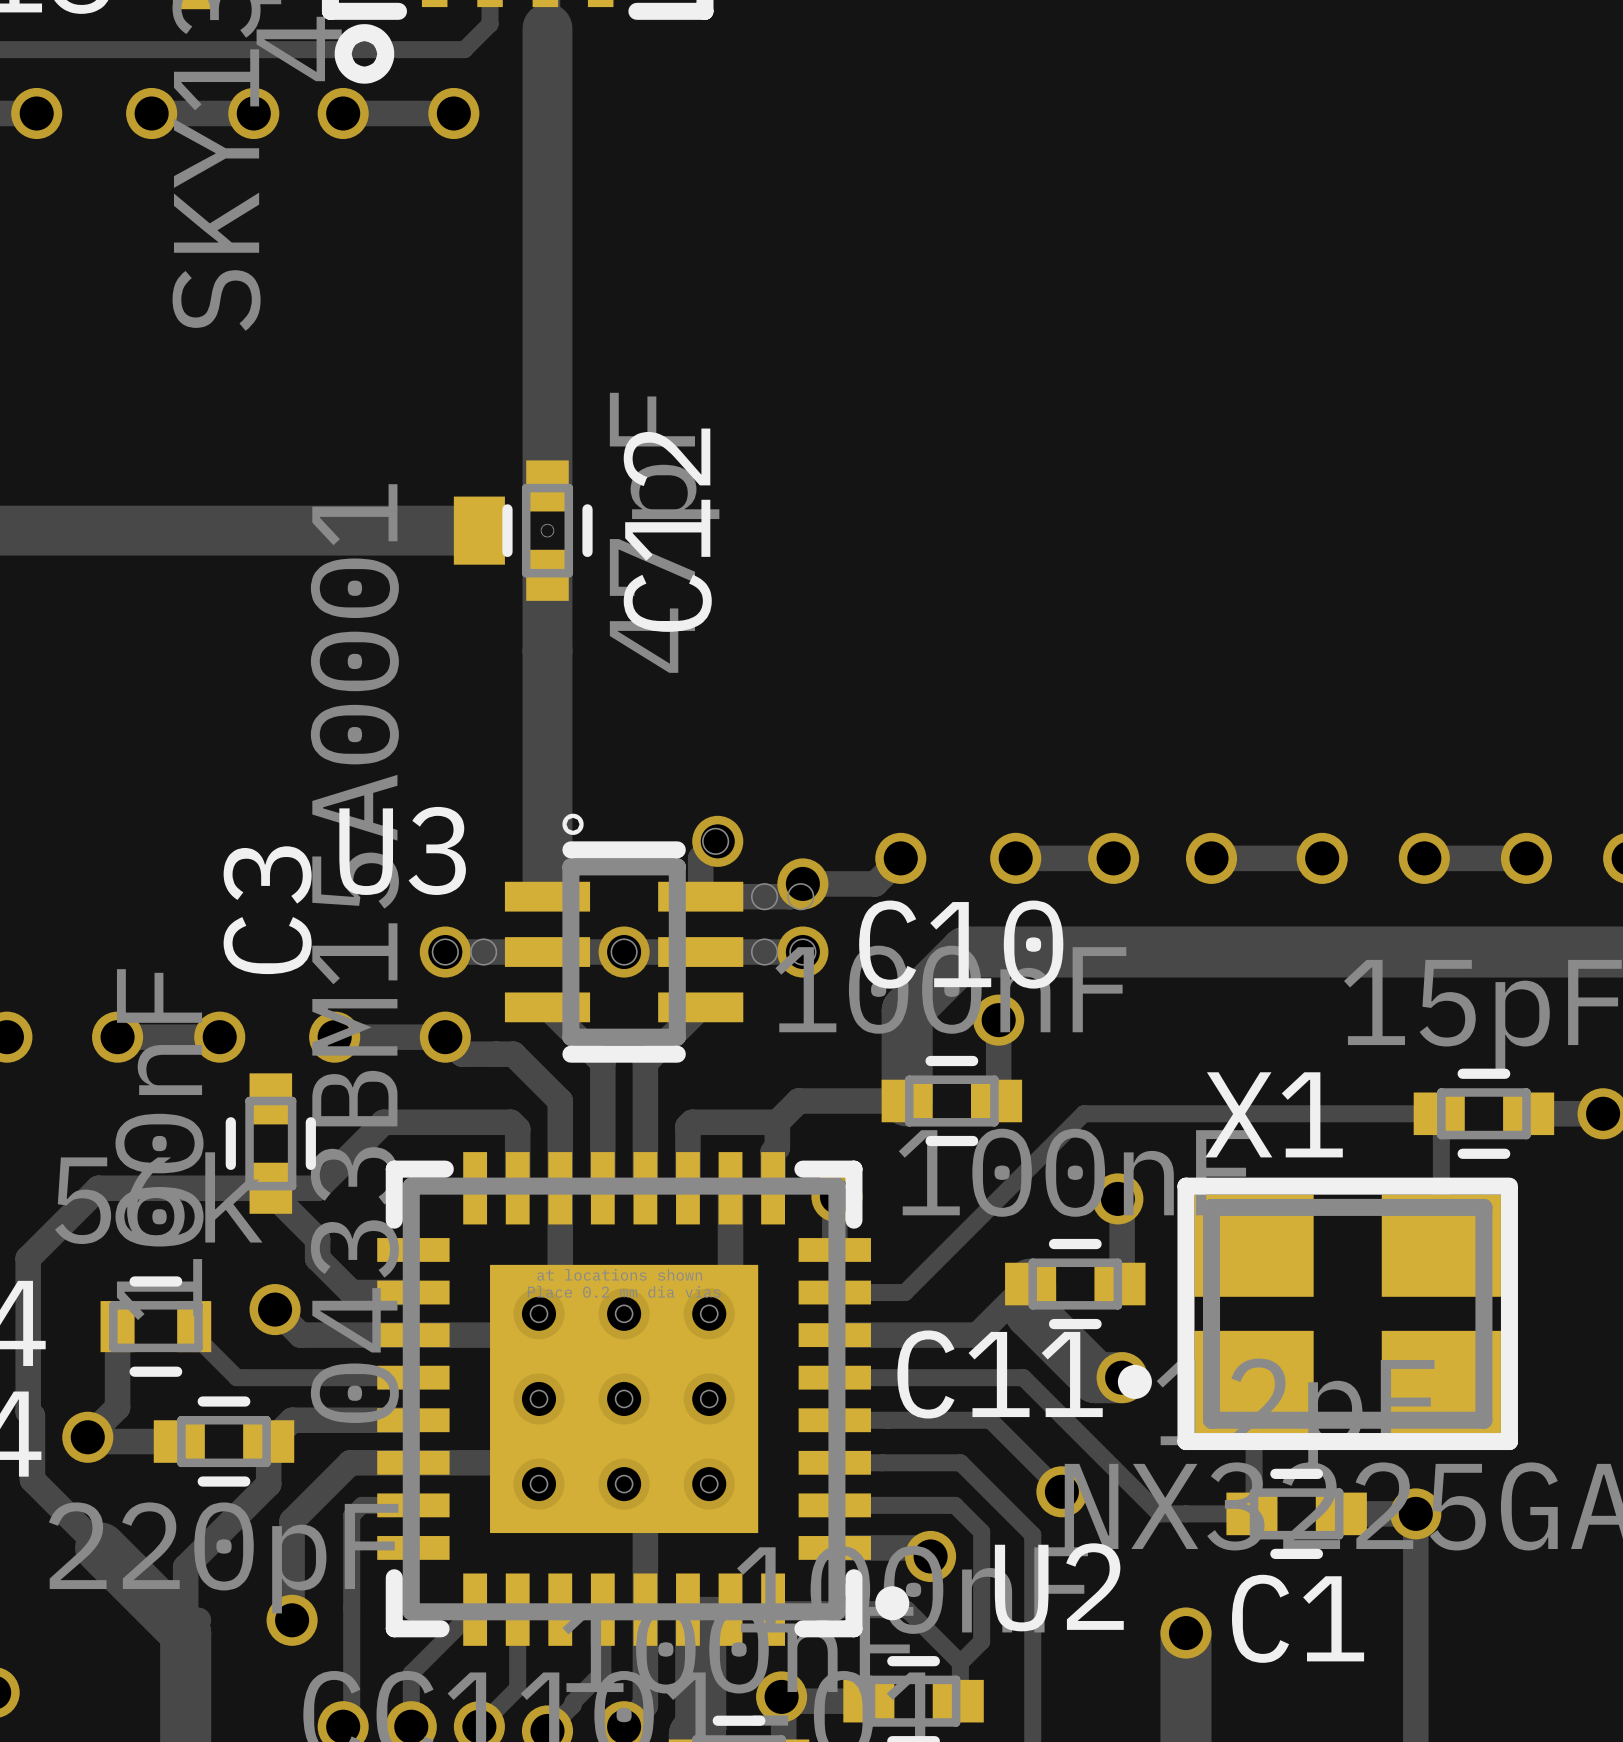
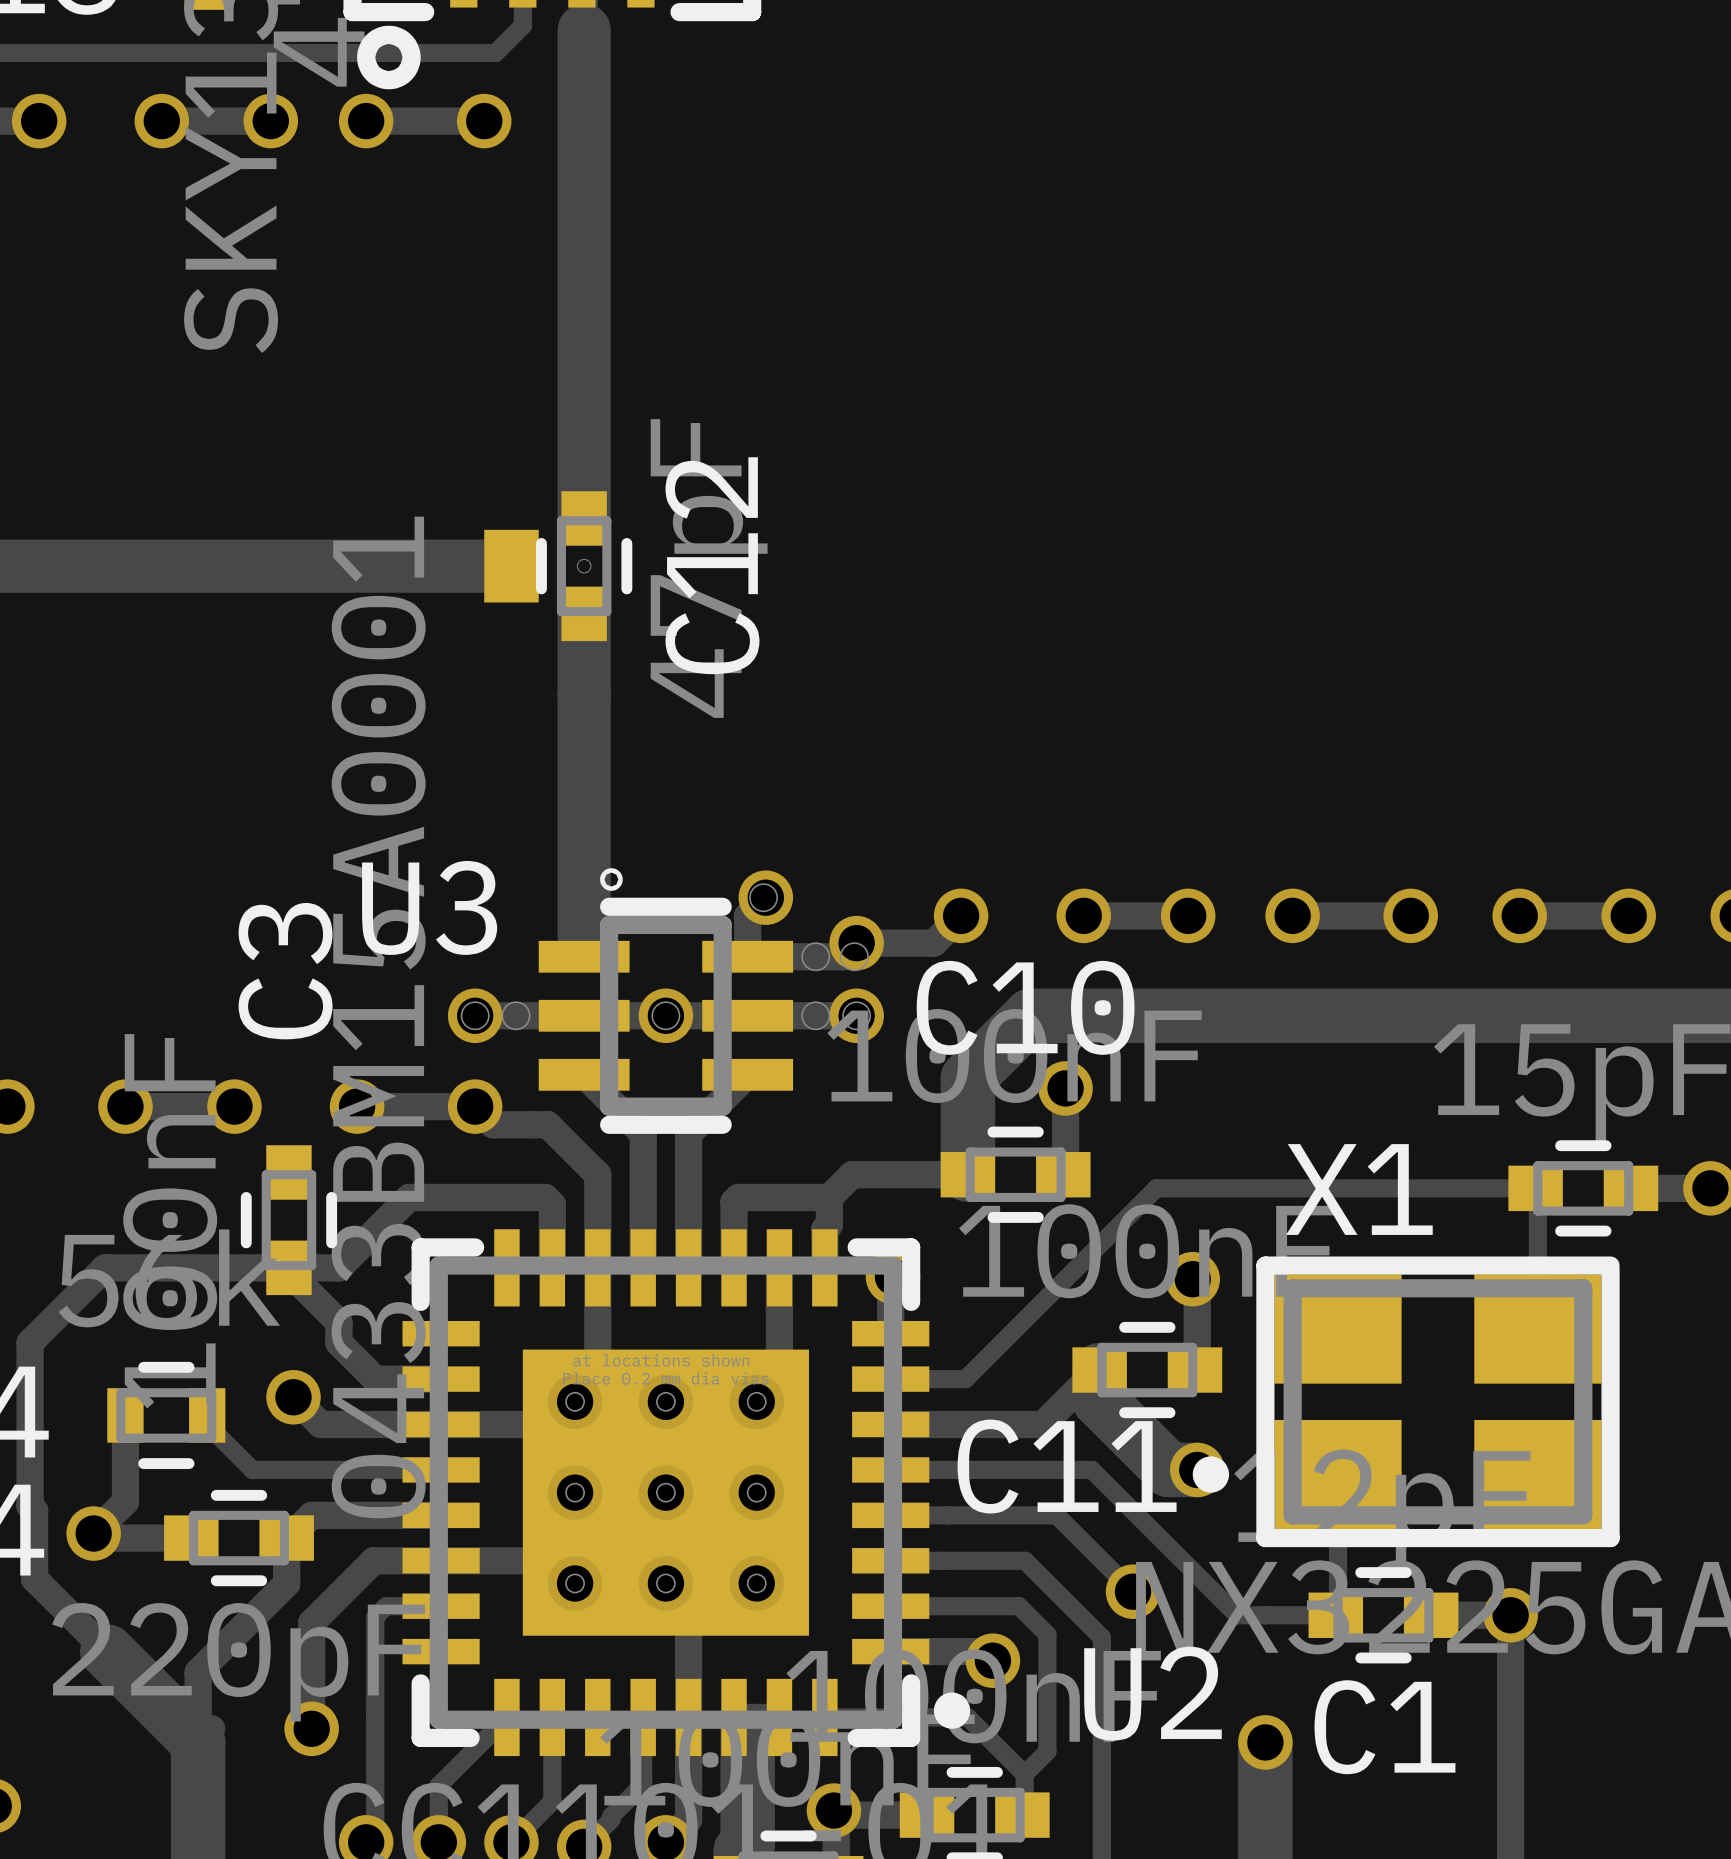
U2 name position: U2 (1059, 1587) -> U2 (1152, 1693)

